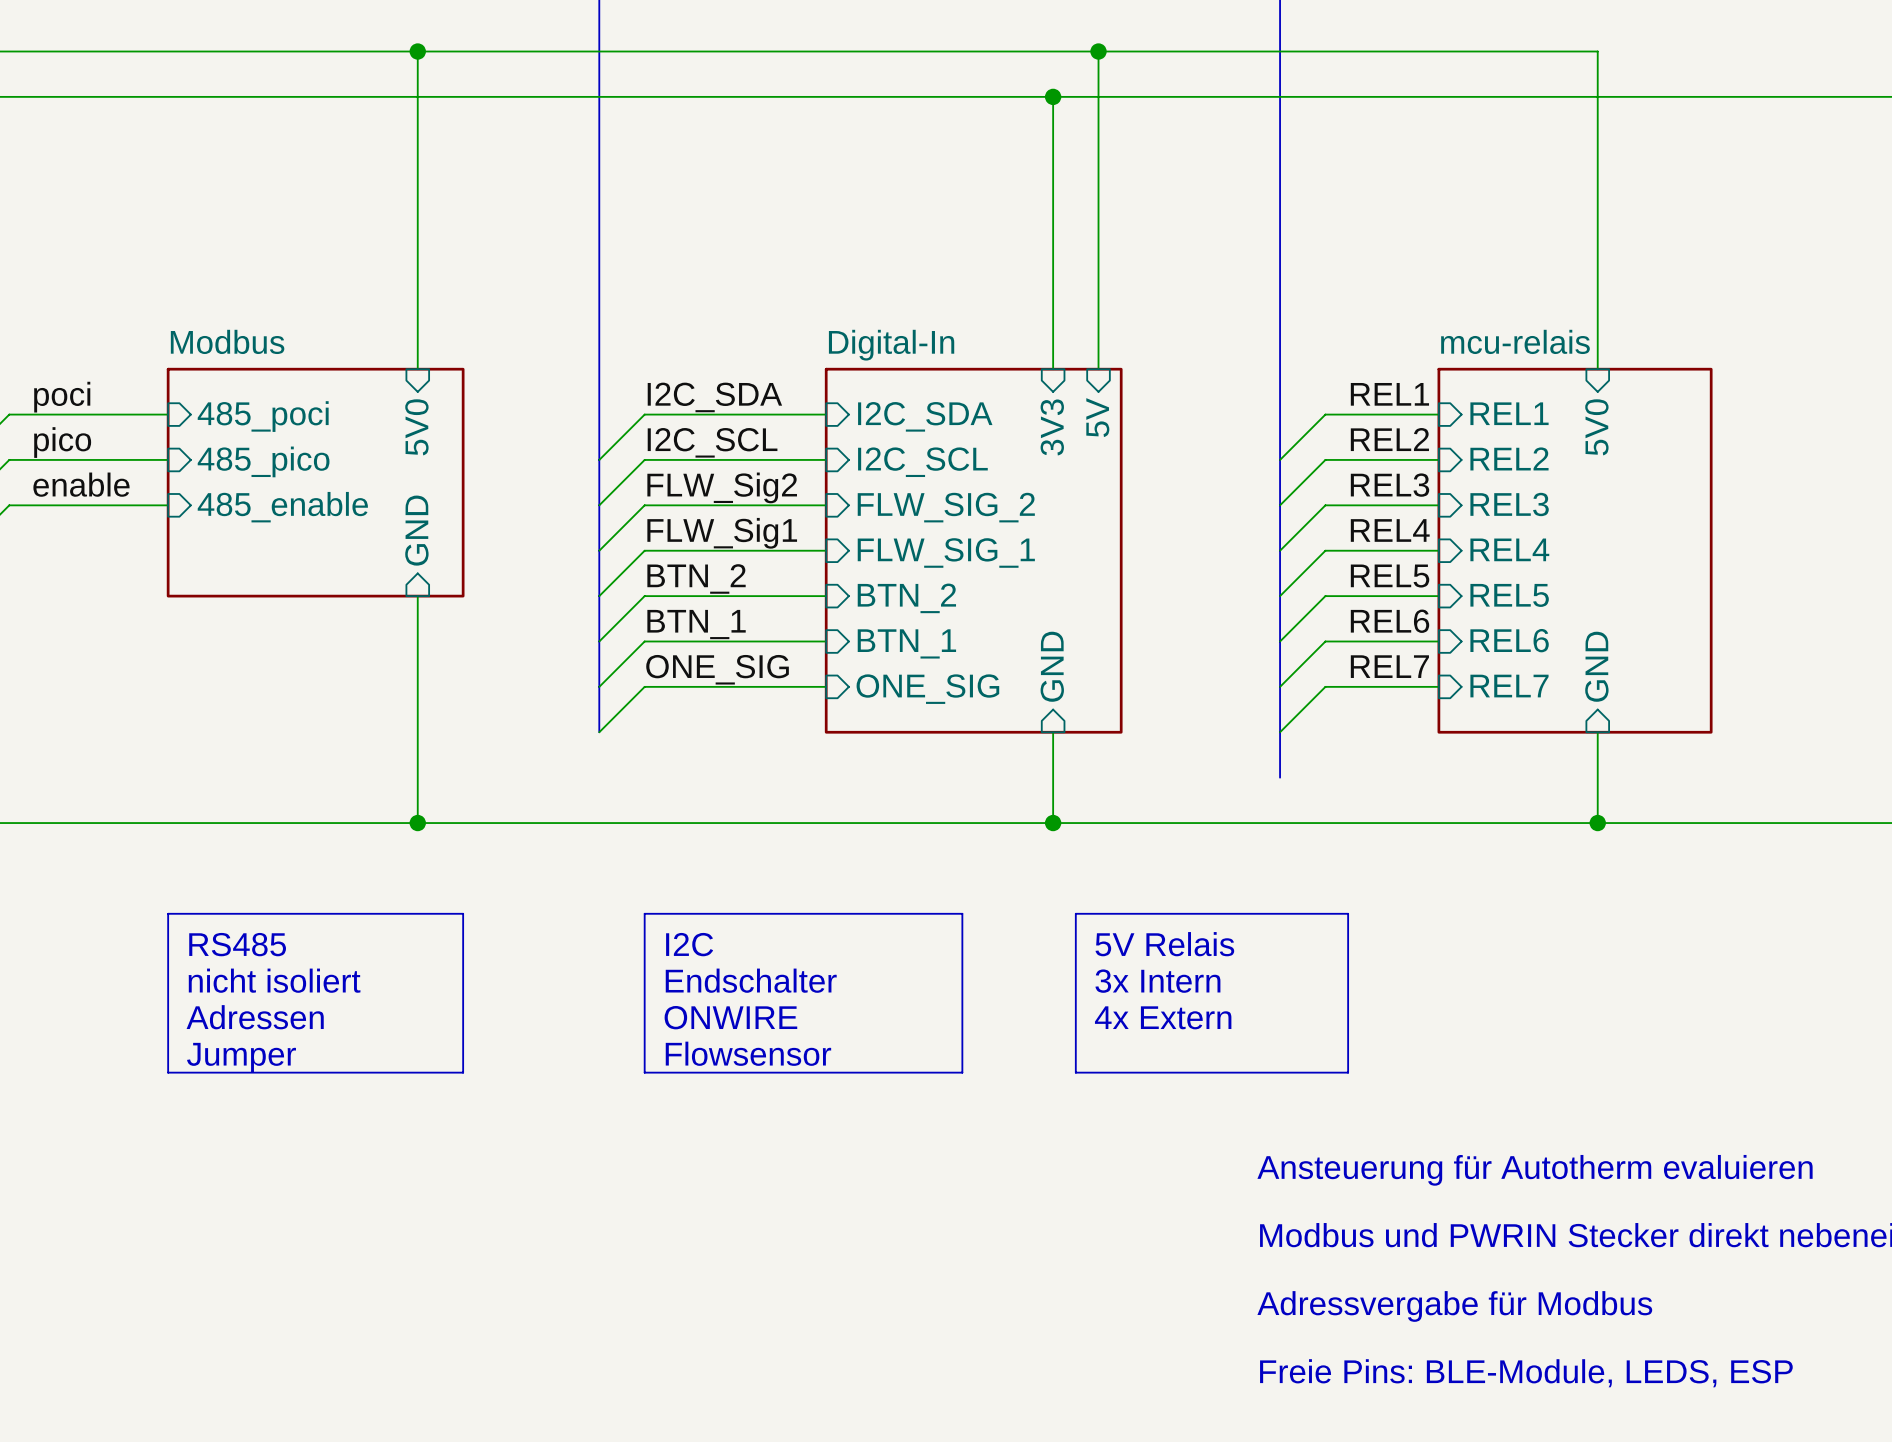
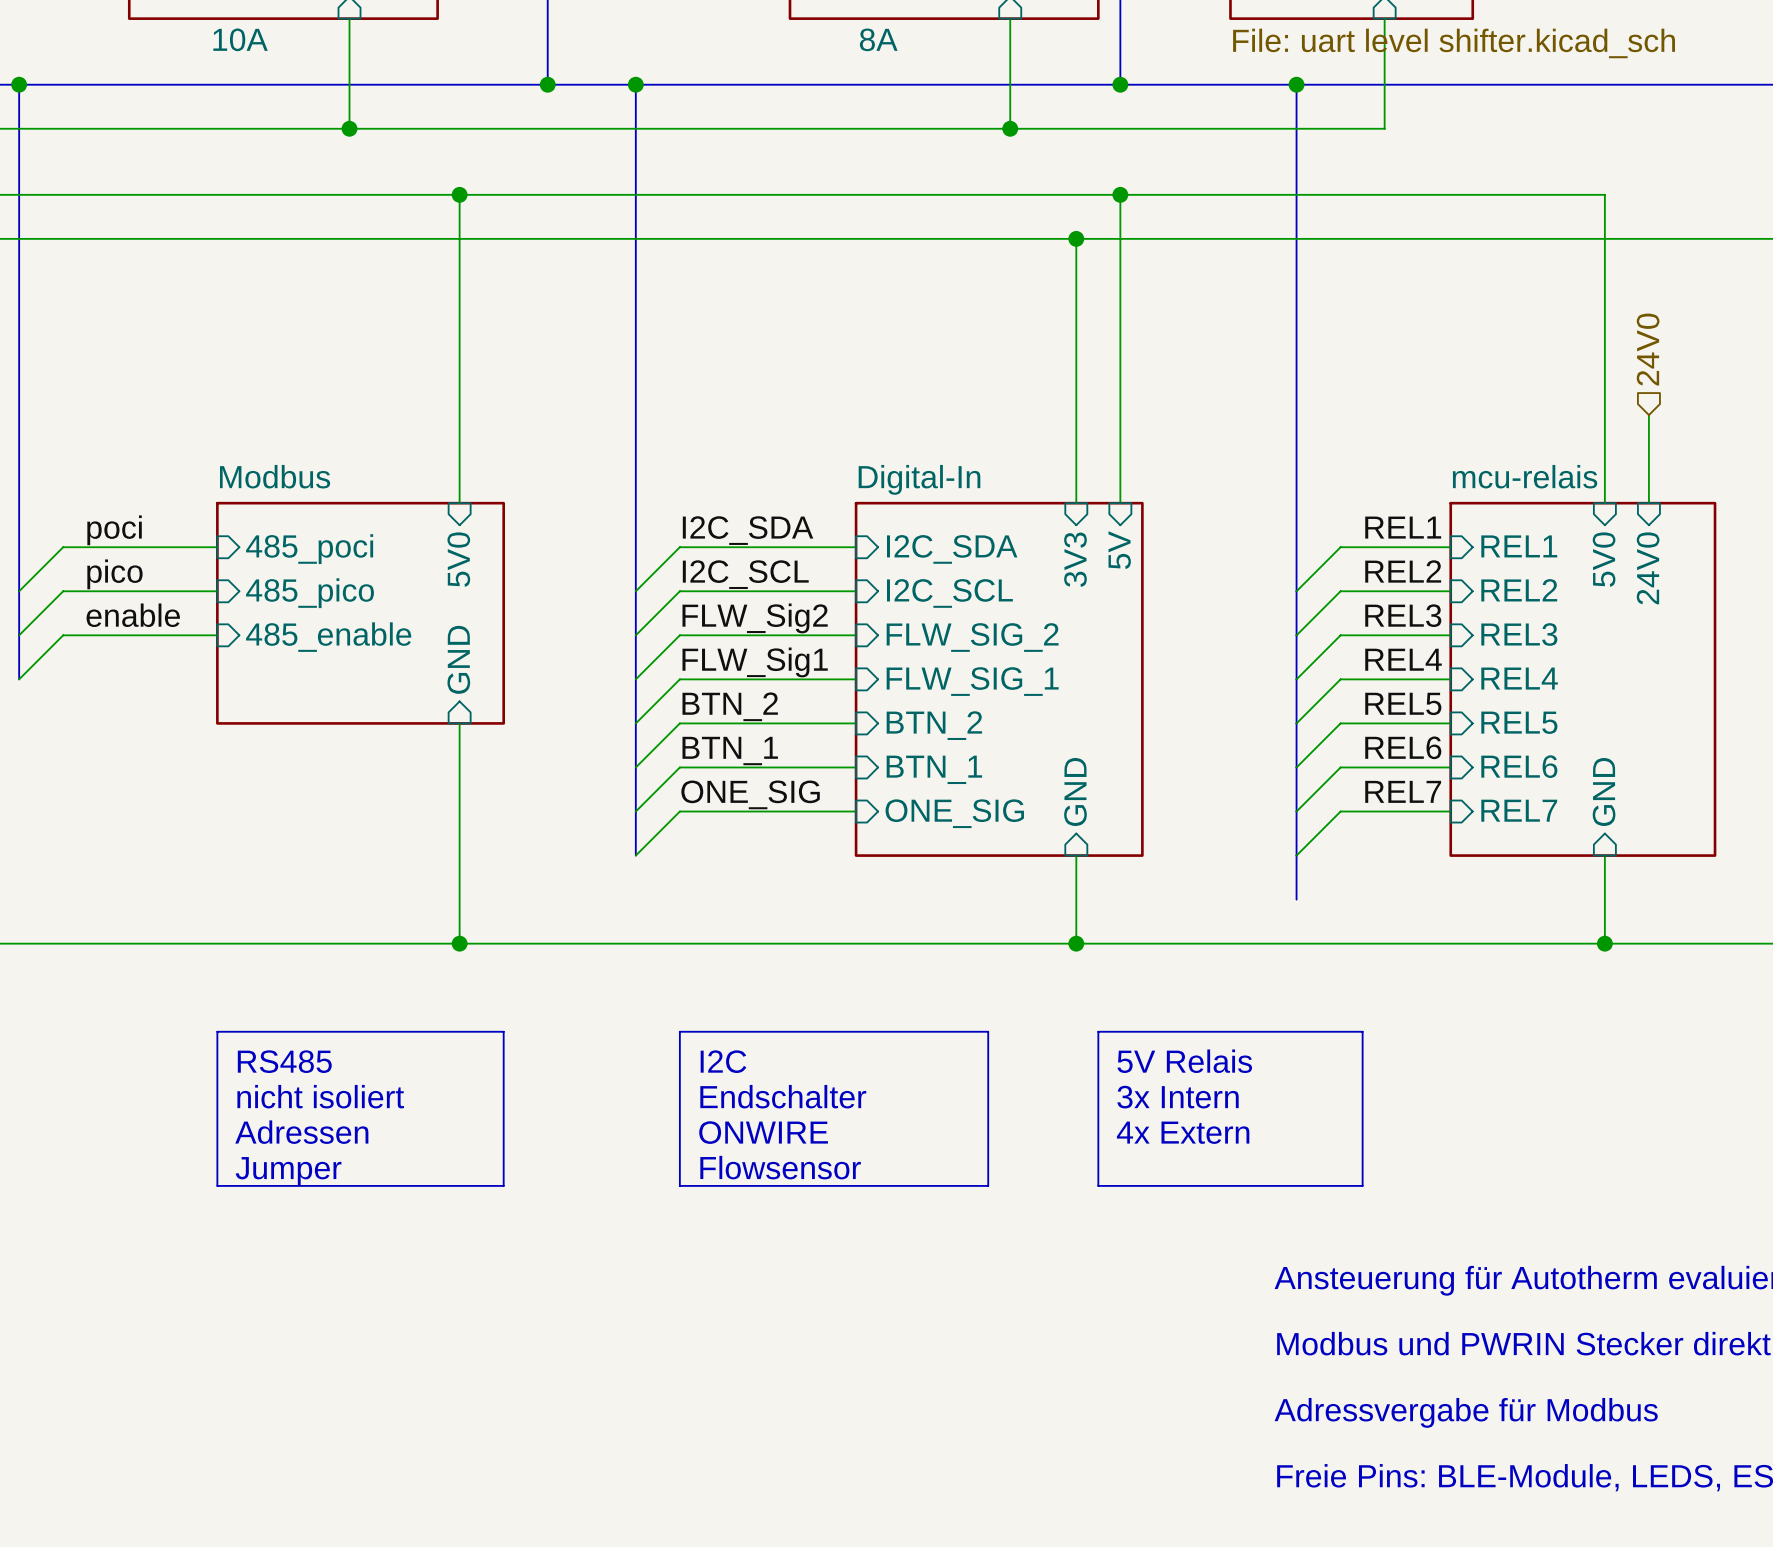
hierarchical label: none -> 24V0 (1648, 349)
wire: none -> (1648, 415) (1648, 503)
sheet pin: none -> 24V0 (1648, 568)

